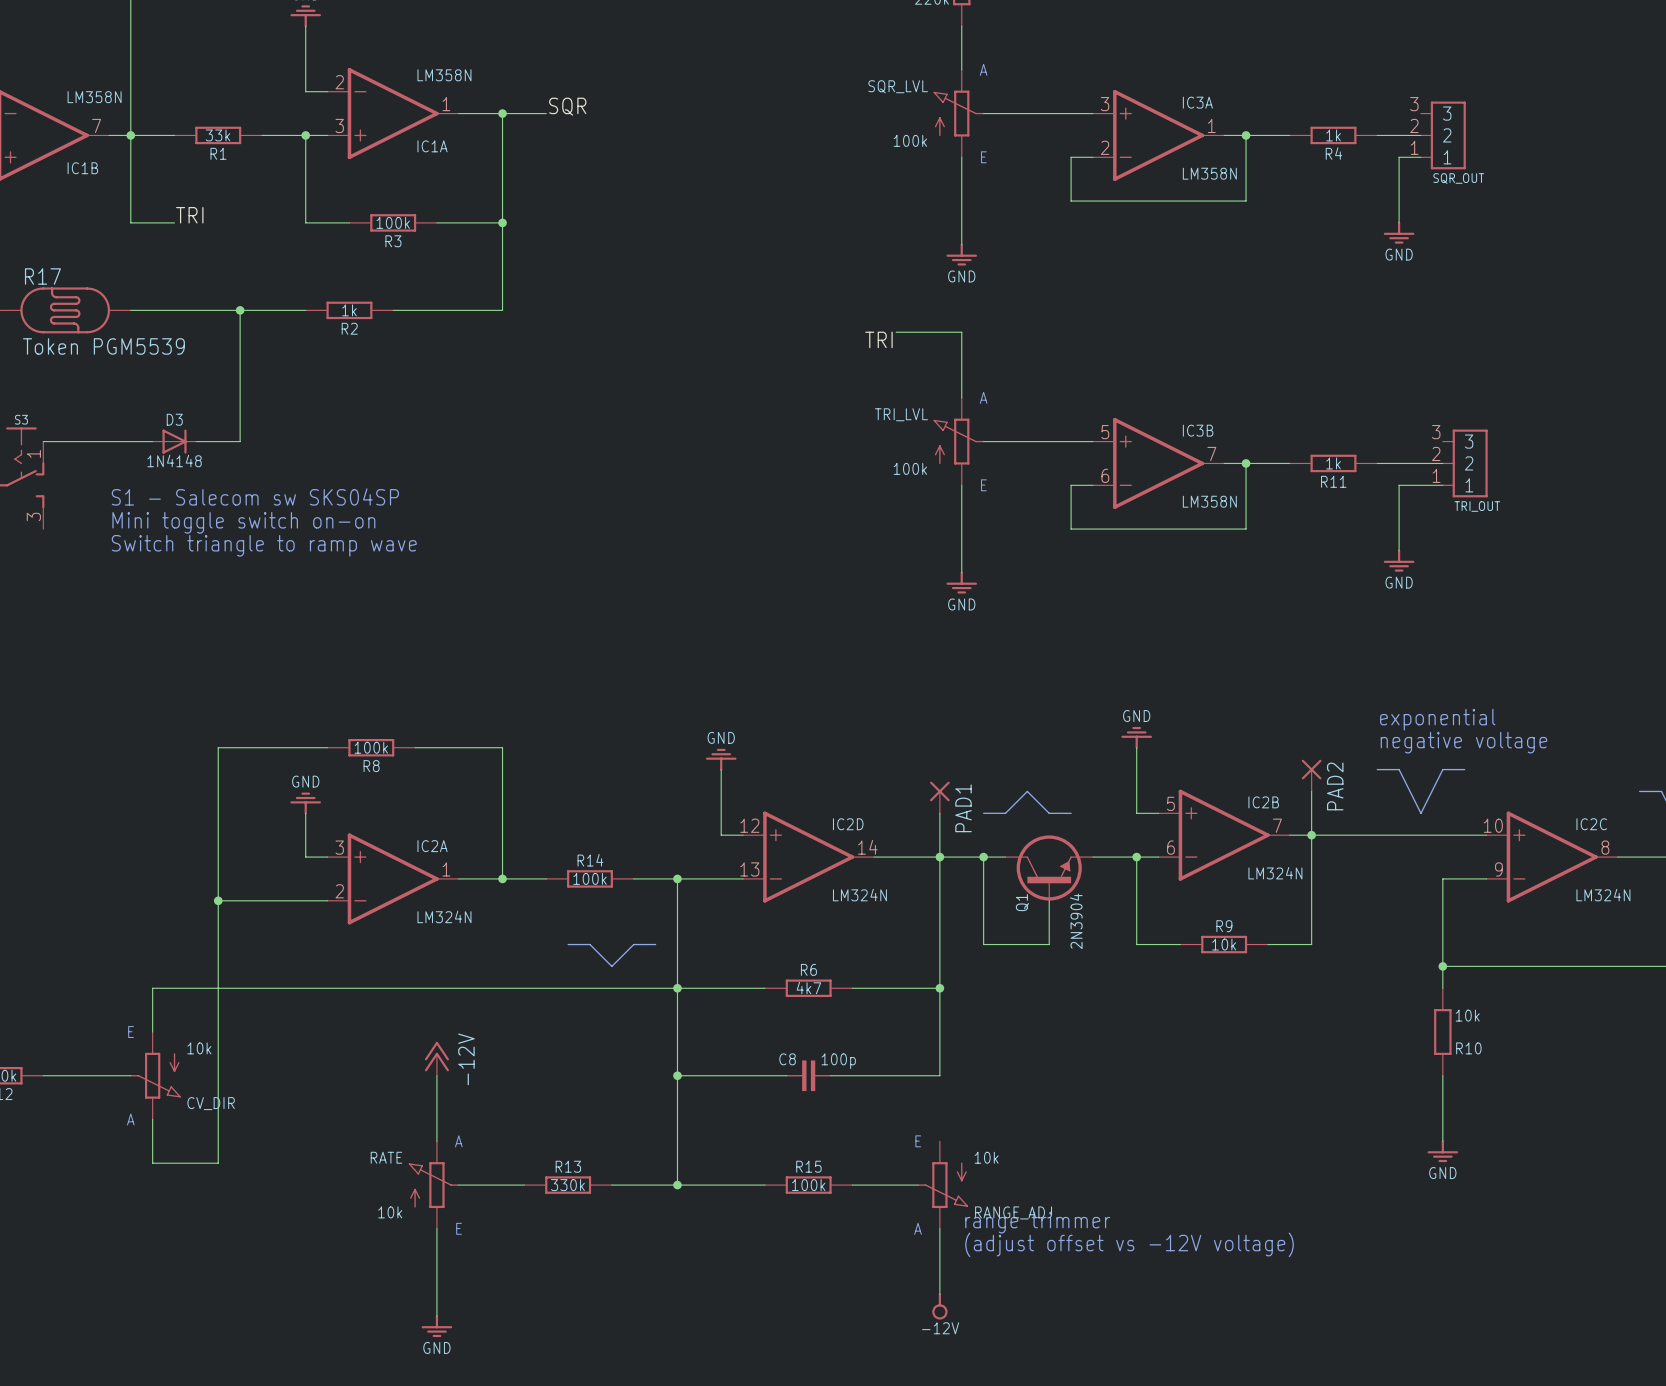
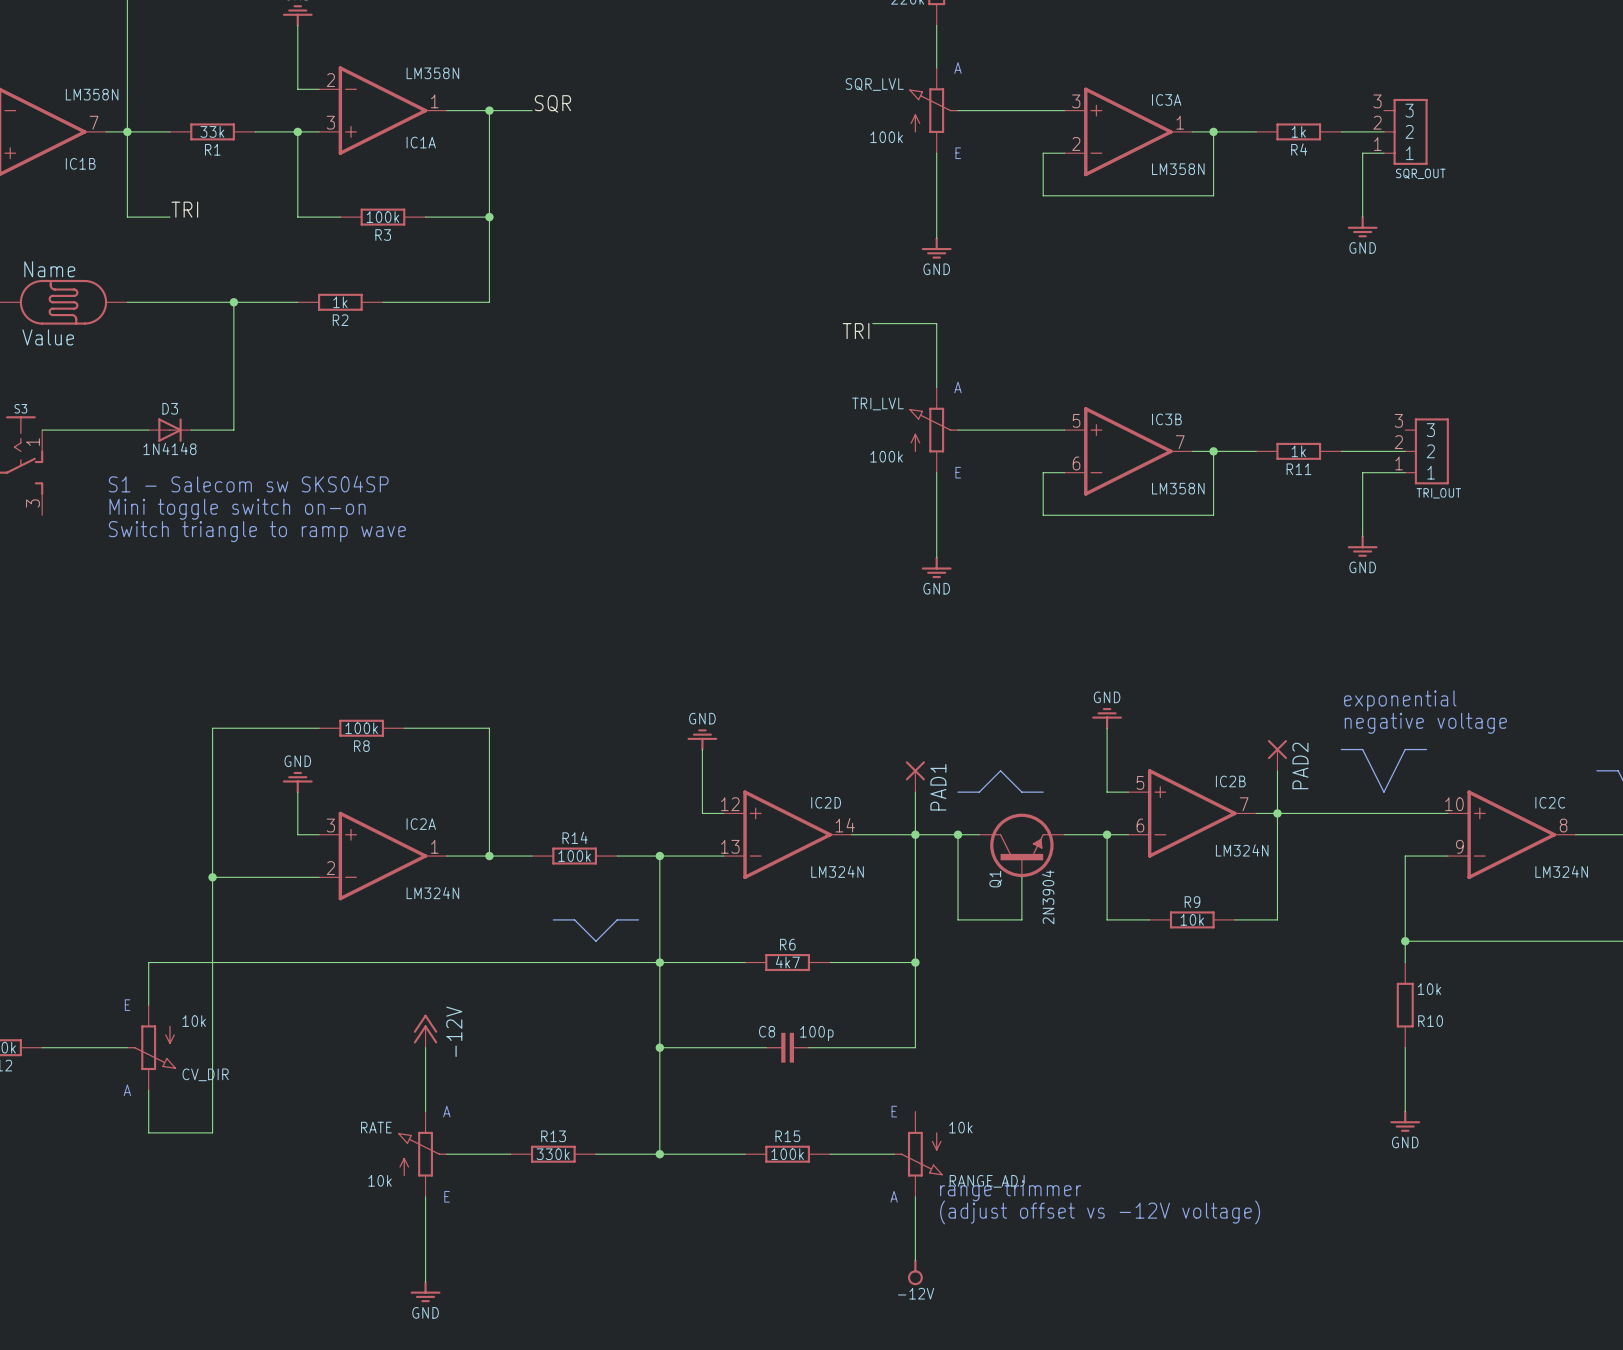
R17 name: R17 (42, 276) -> none
R17 text: none -> Name (49, 269)
R17 text: none -> Value (48, 337)
R17 value: Token PGM5539 (103, 346) -> none

